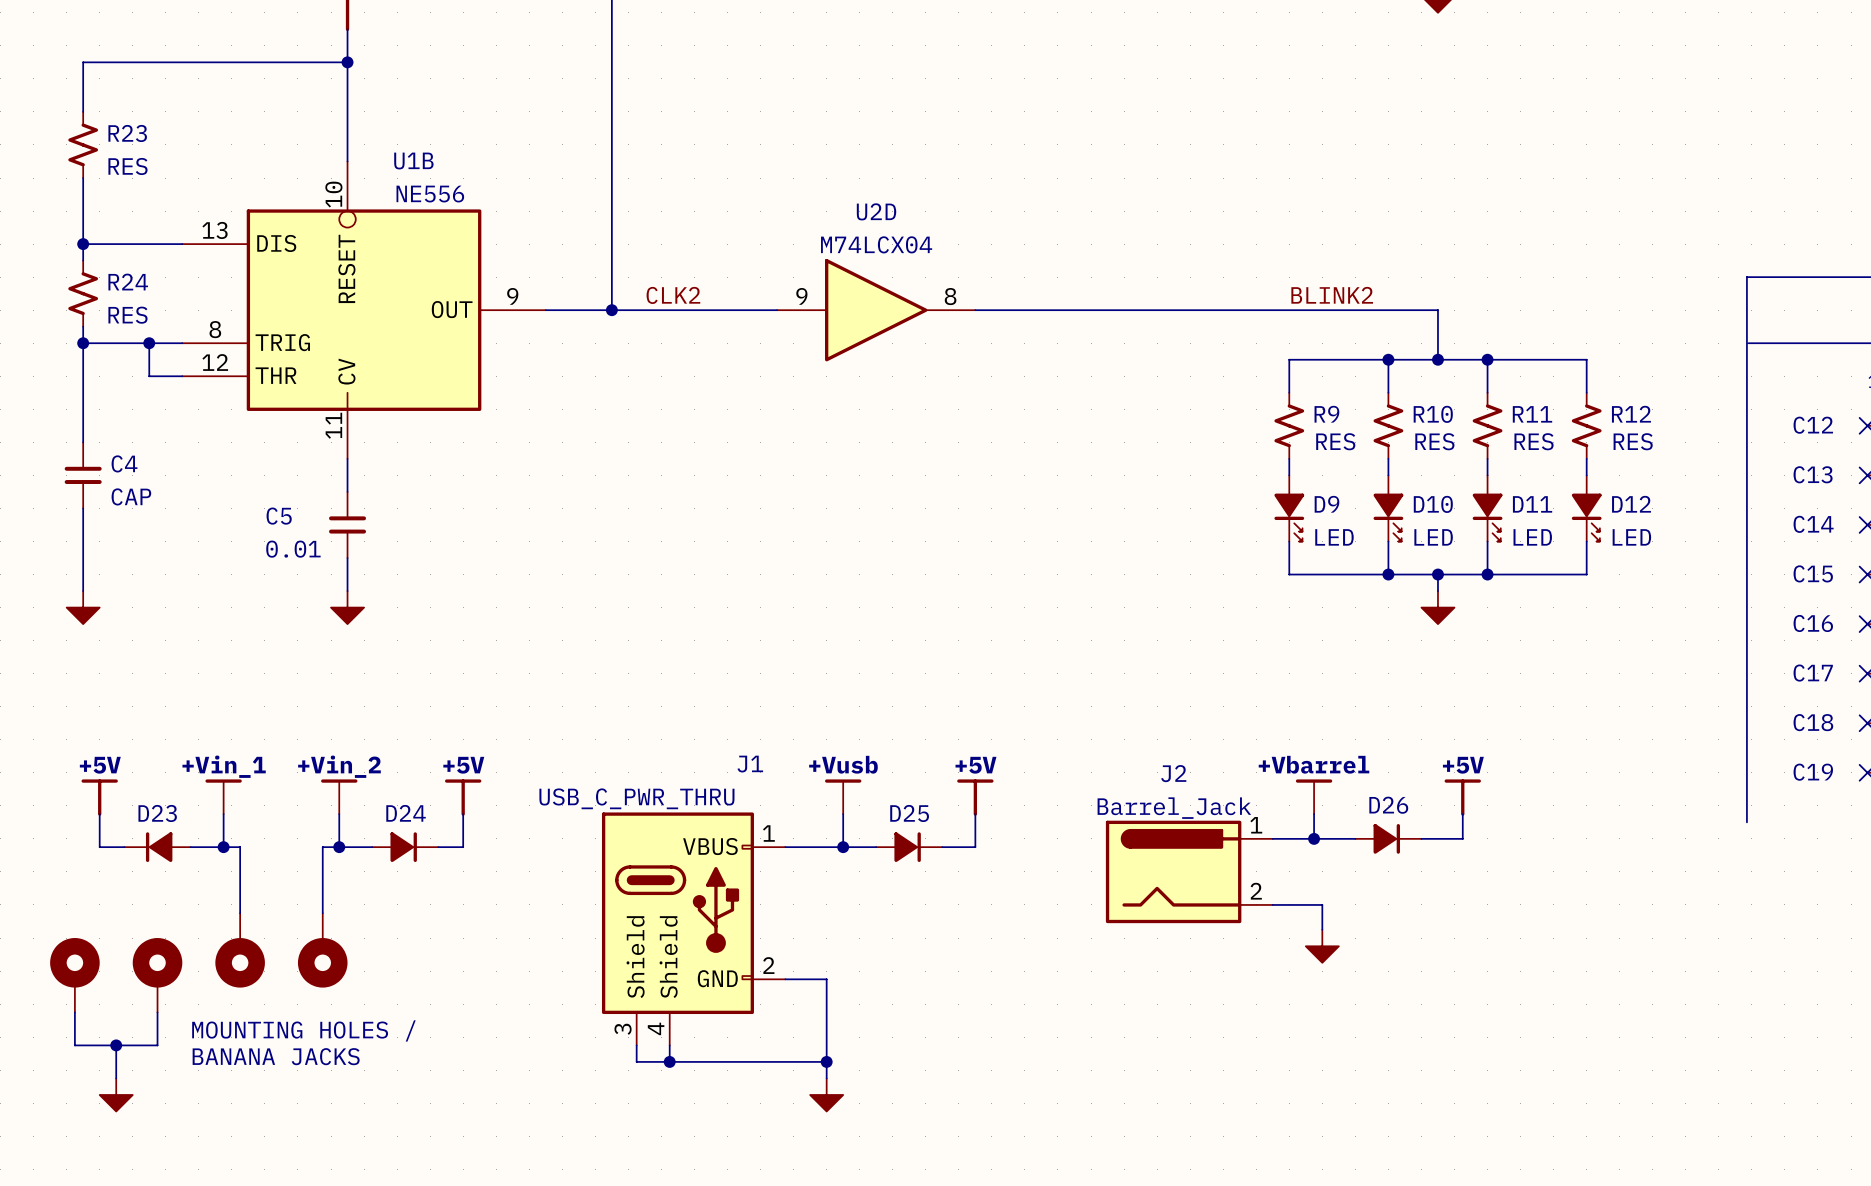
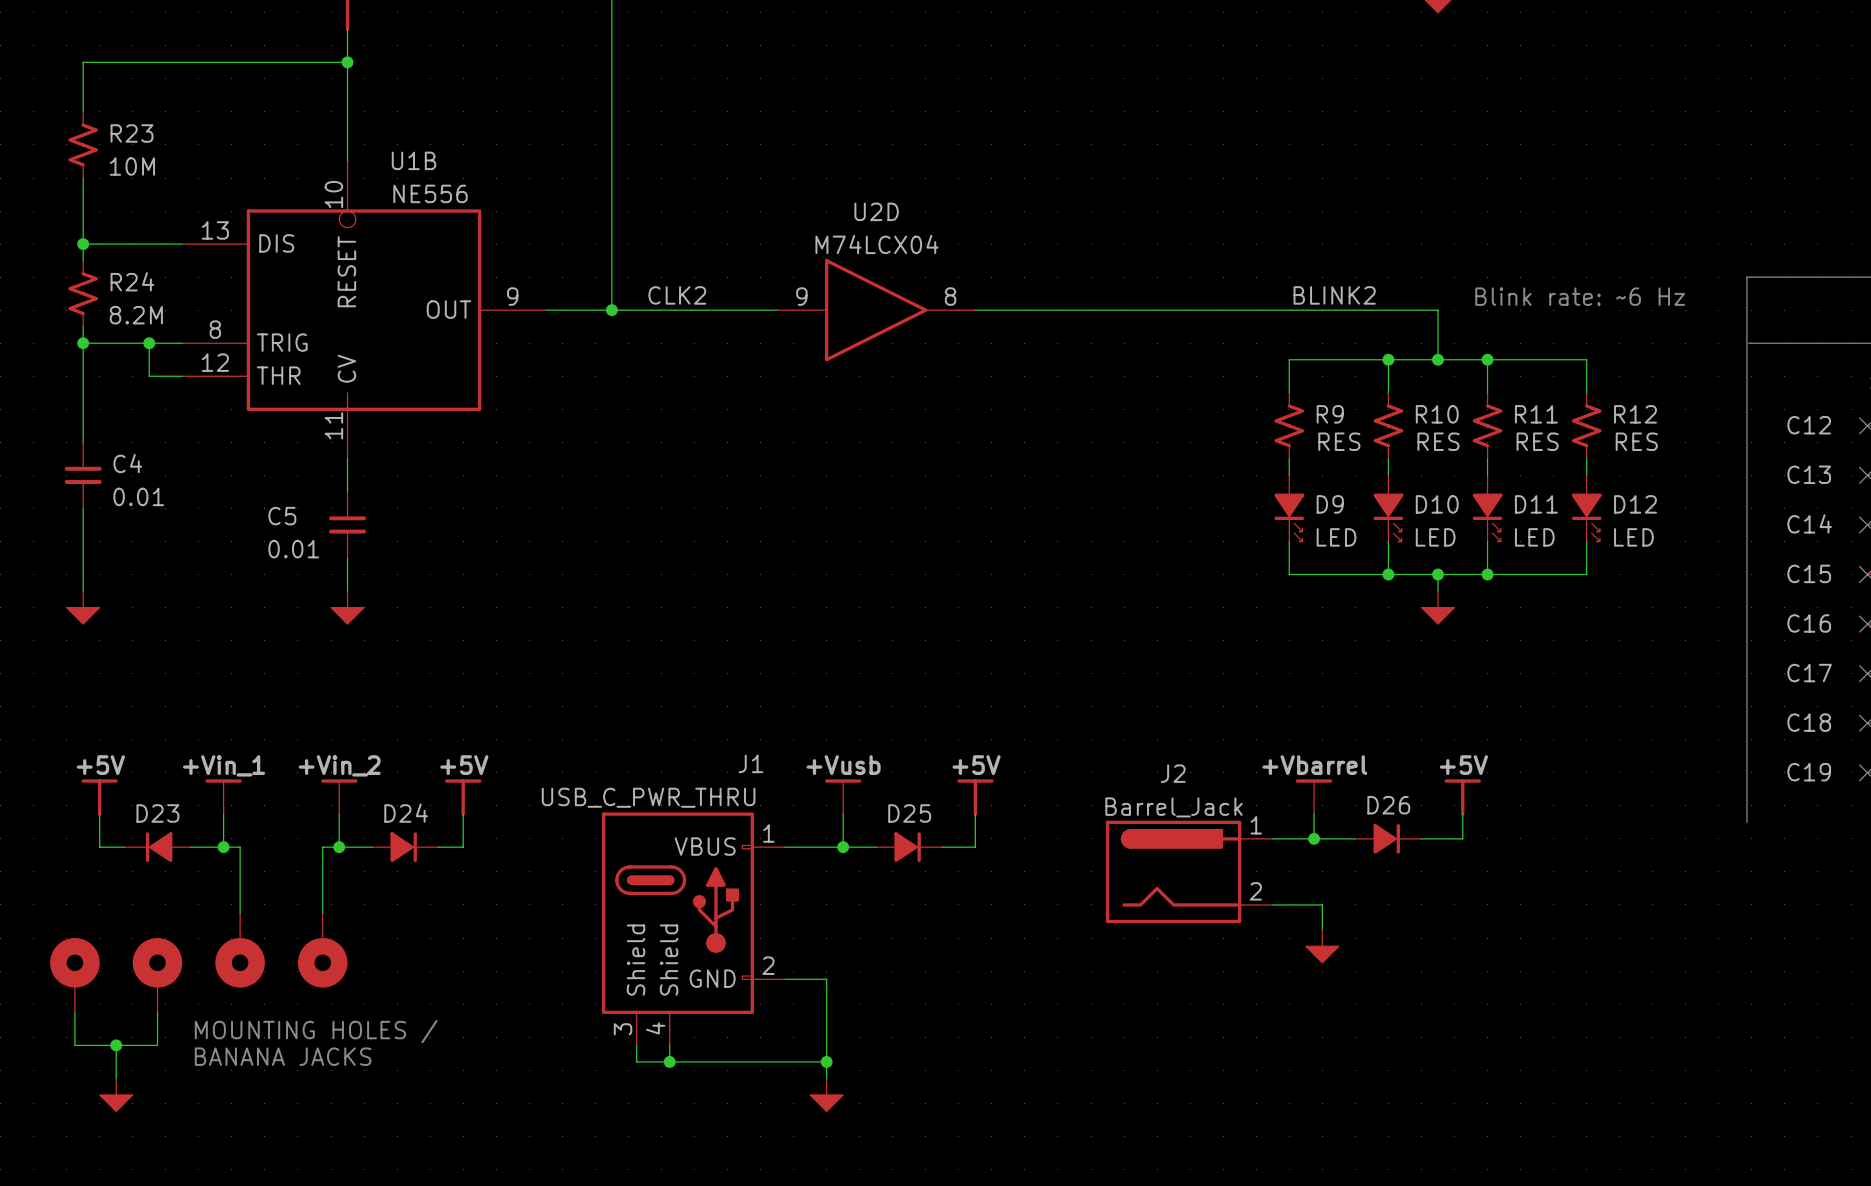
R23 value: RES (127, 166) -> 10M (132, 166)
text: none -> Blink rate: ~6 Hz (1580, 296)
R24 value: RES (127, 315) -> 8.2M (136, 315)
C4 value: CAP (131, 496) -> 0.01 (138, 496)

